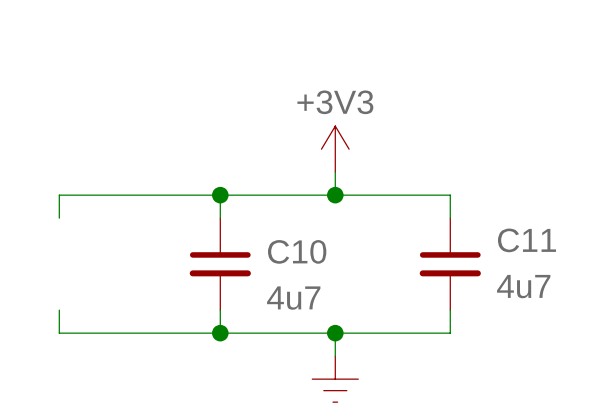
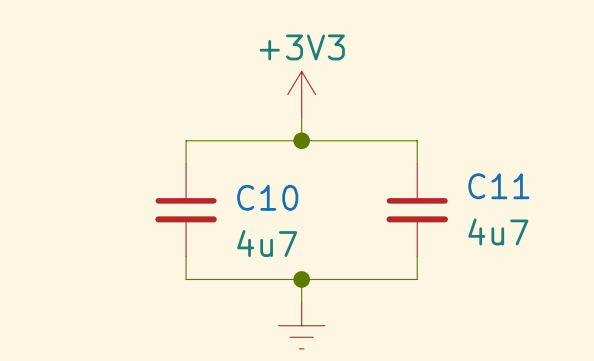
wire: (220, 195) (59, 195) (59, 218) -> none
junction: (220, 195) -> none
wire: (59, 310) (59, 333) (220, 333) -> none
junction: (220, 333) -> none

